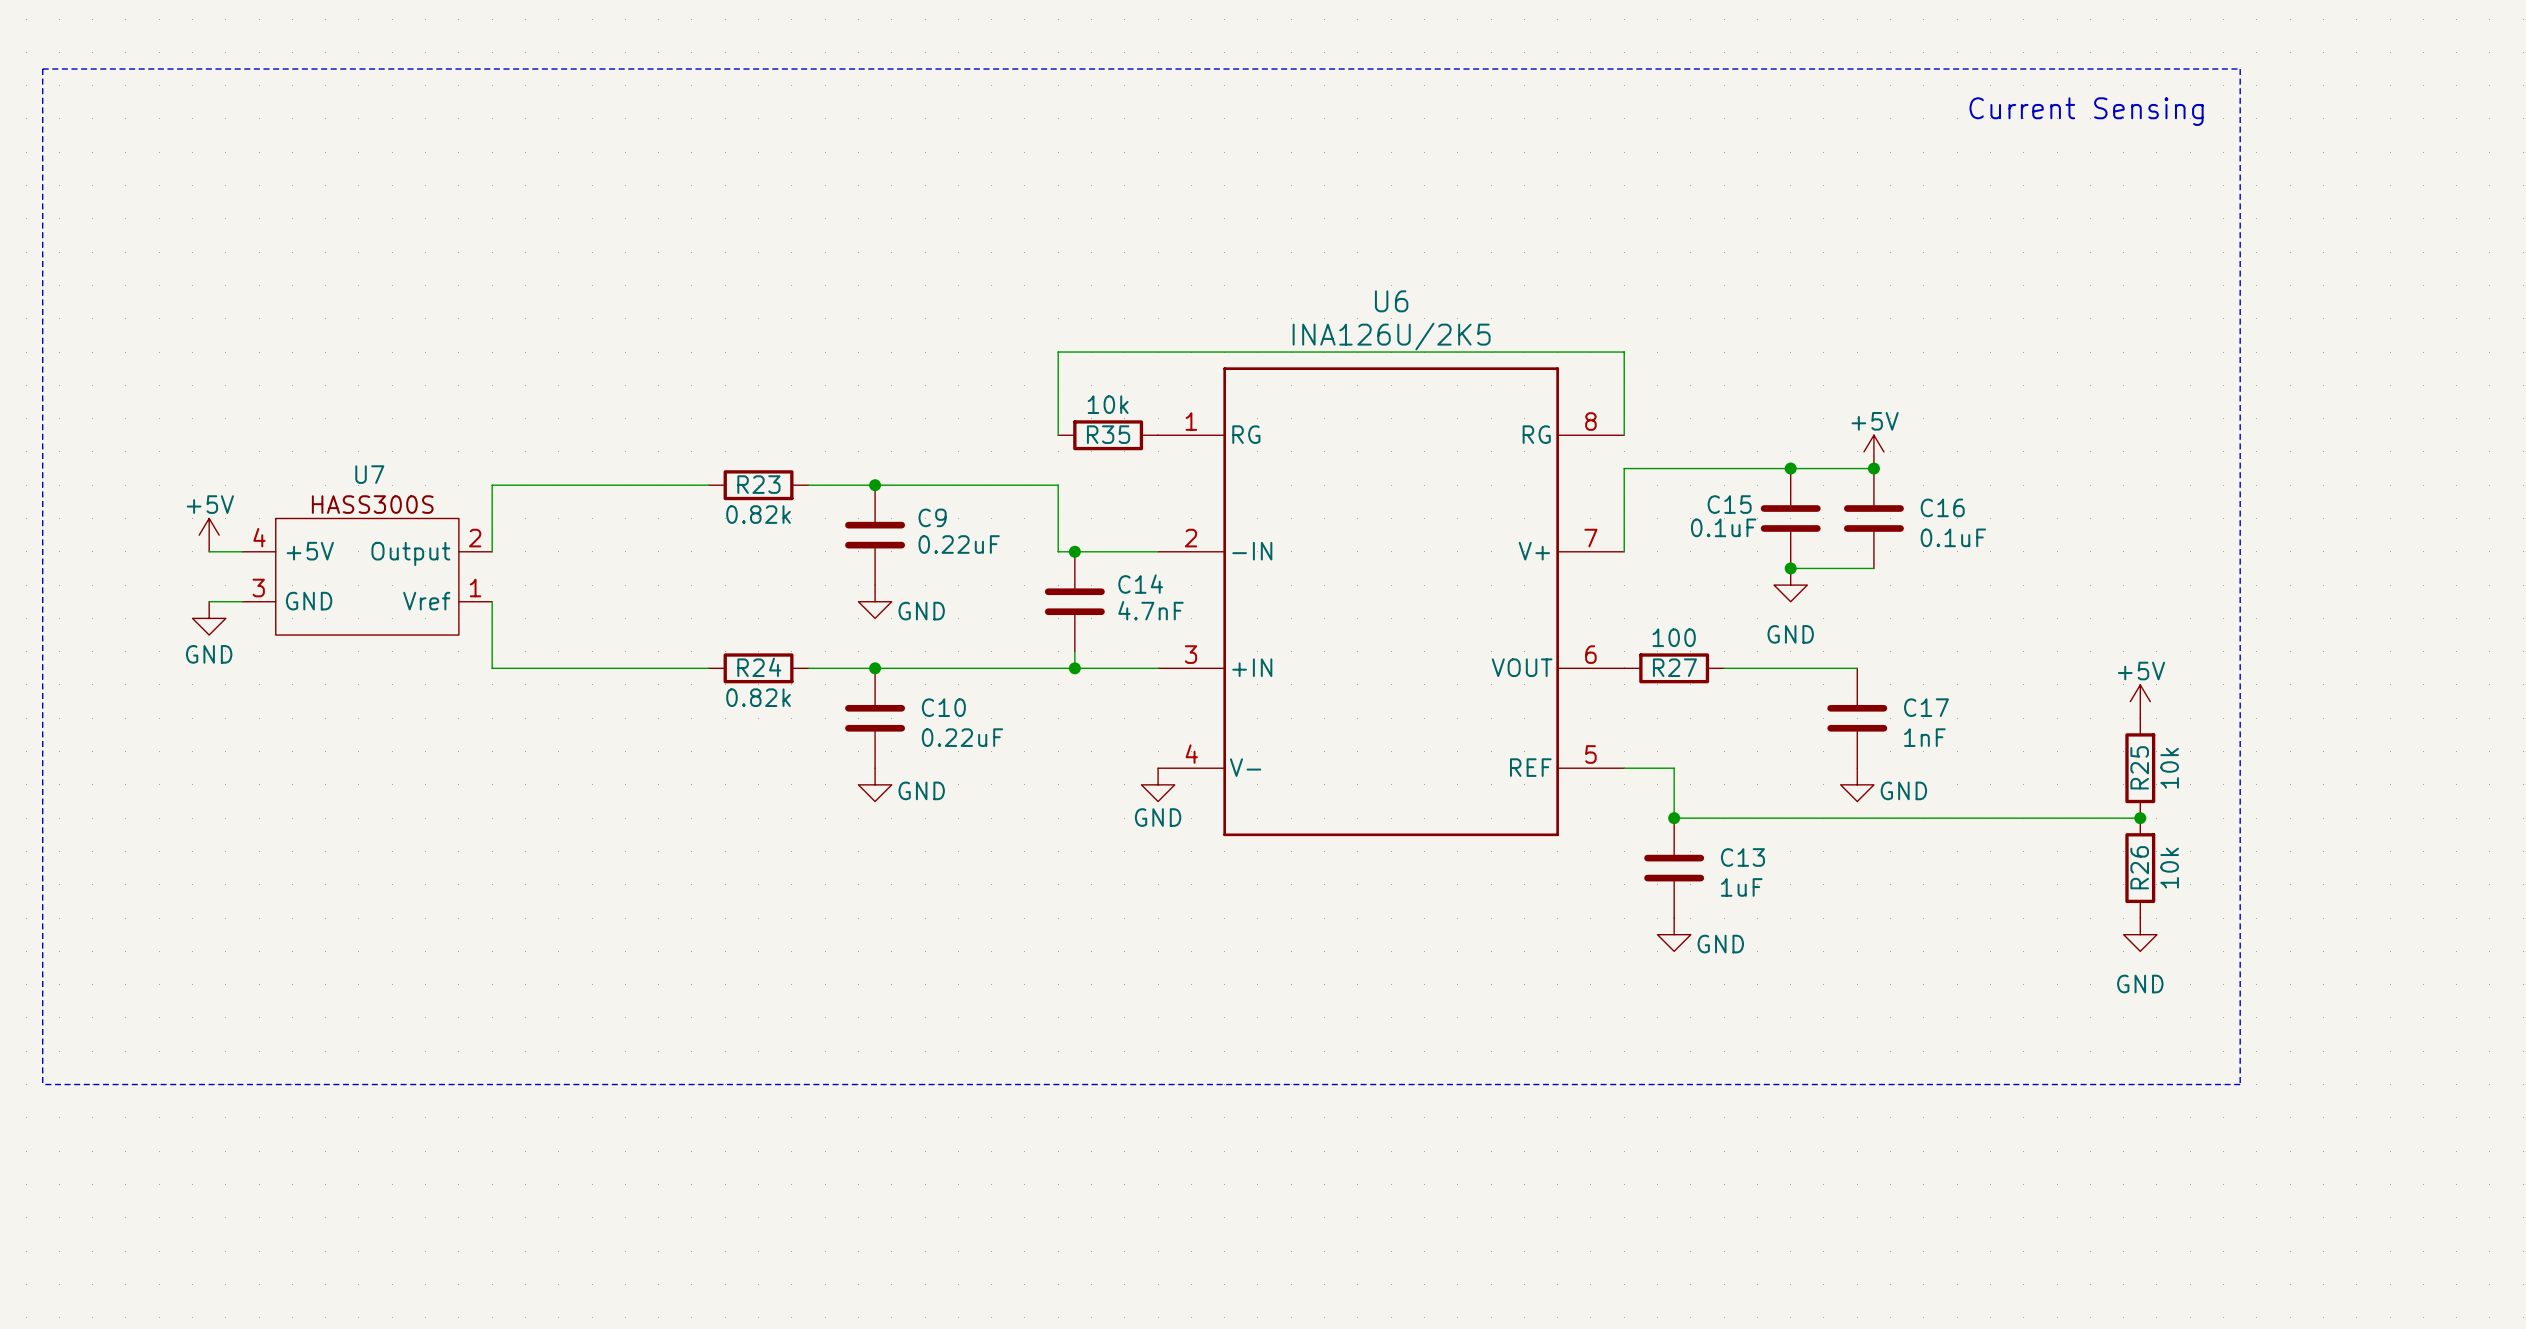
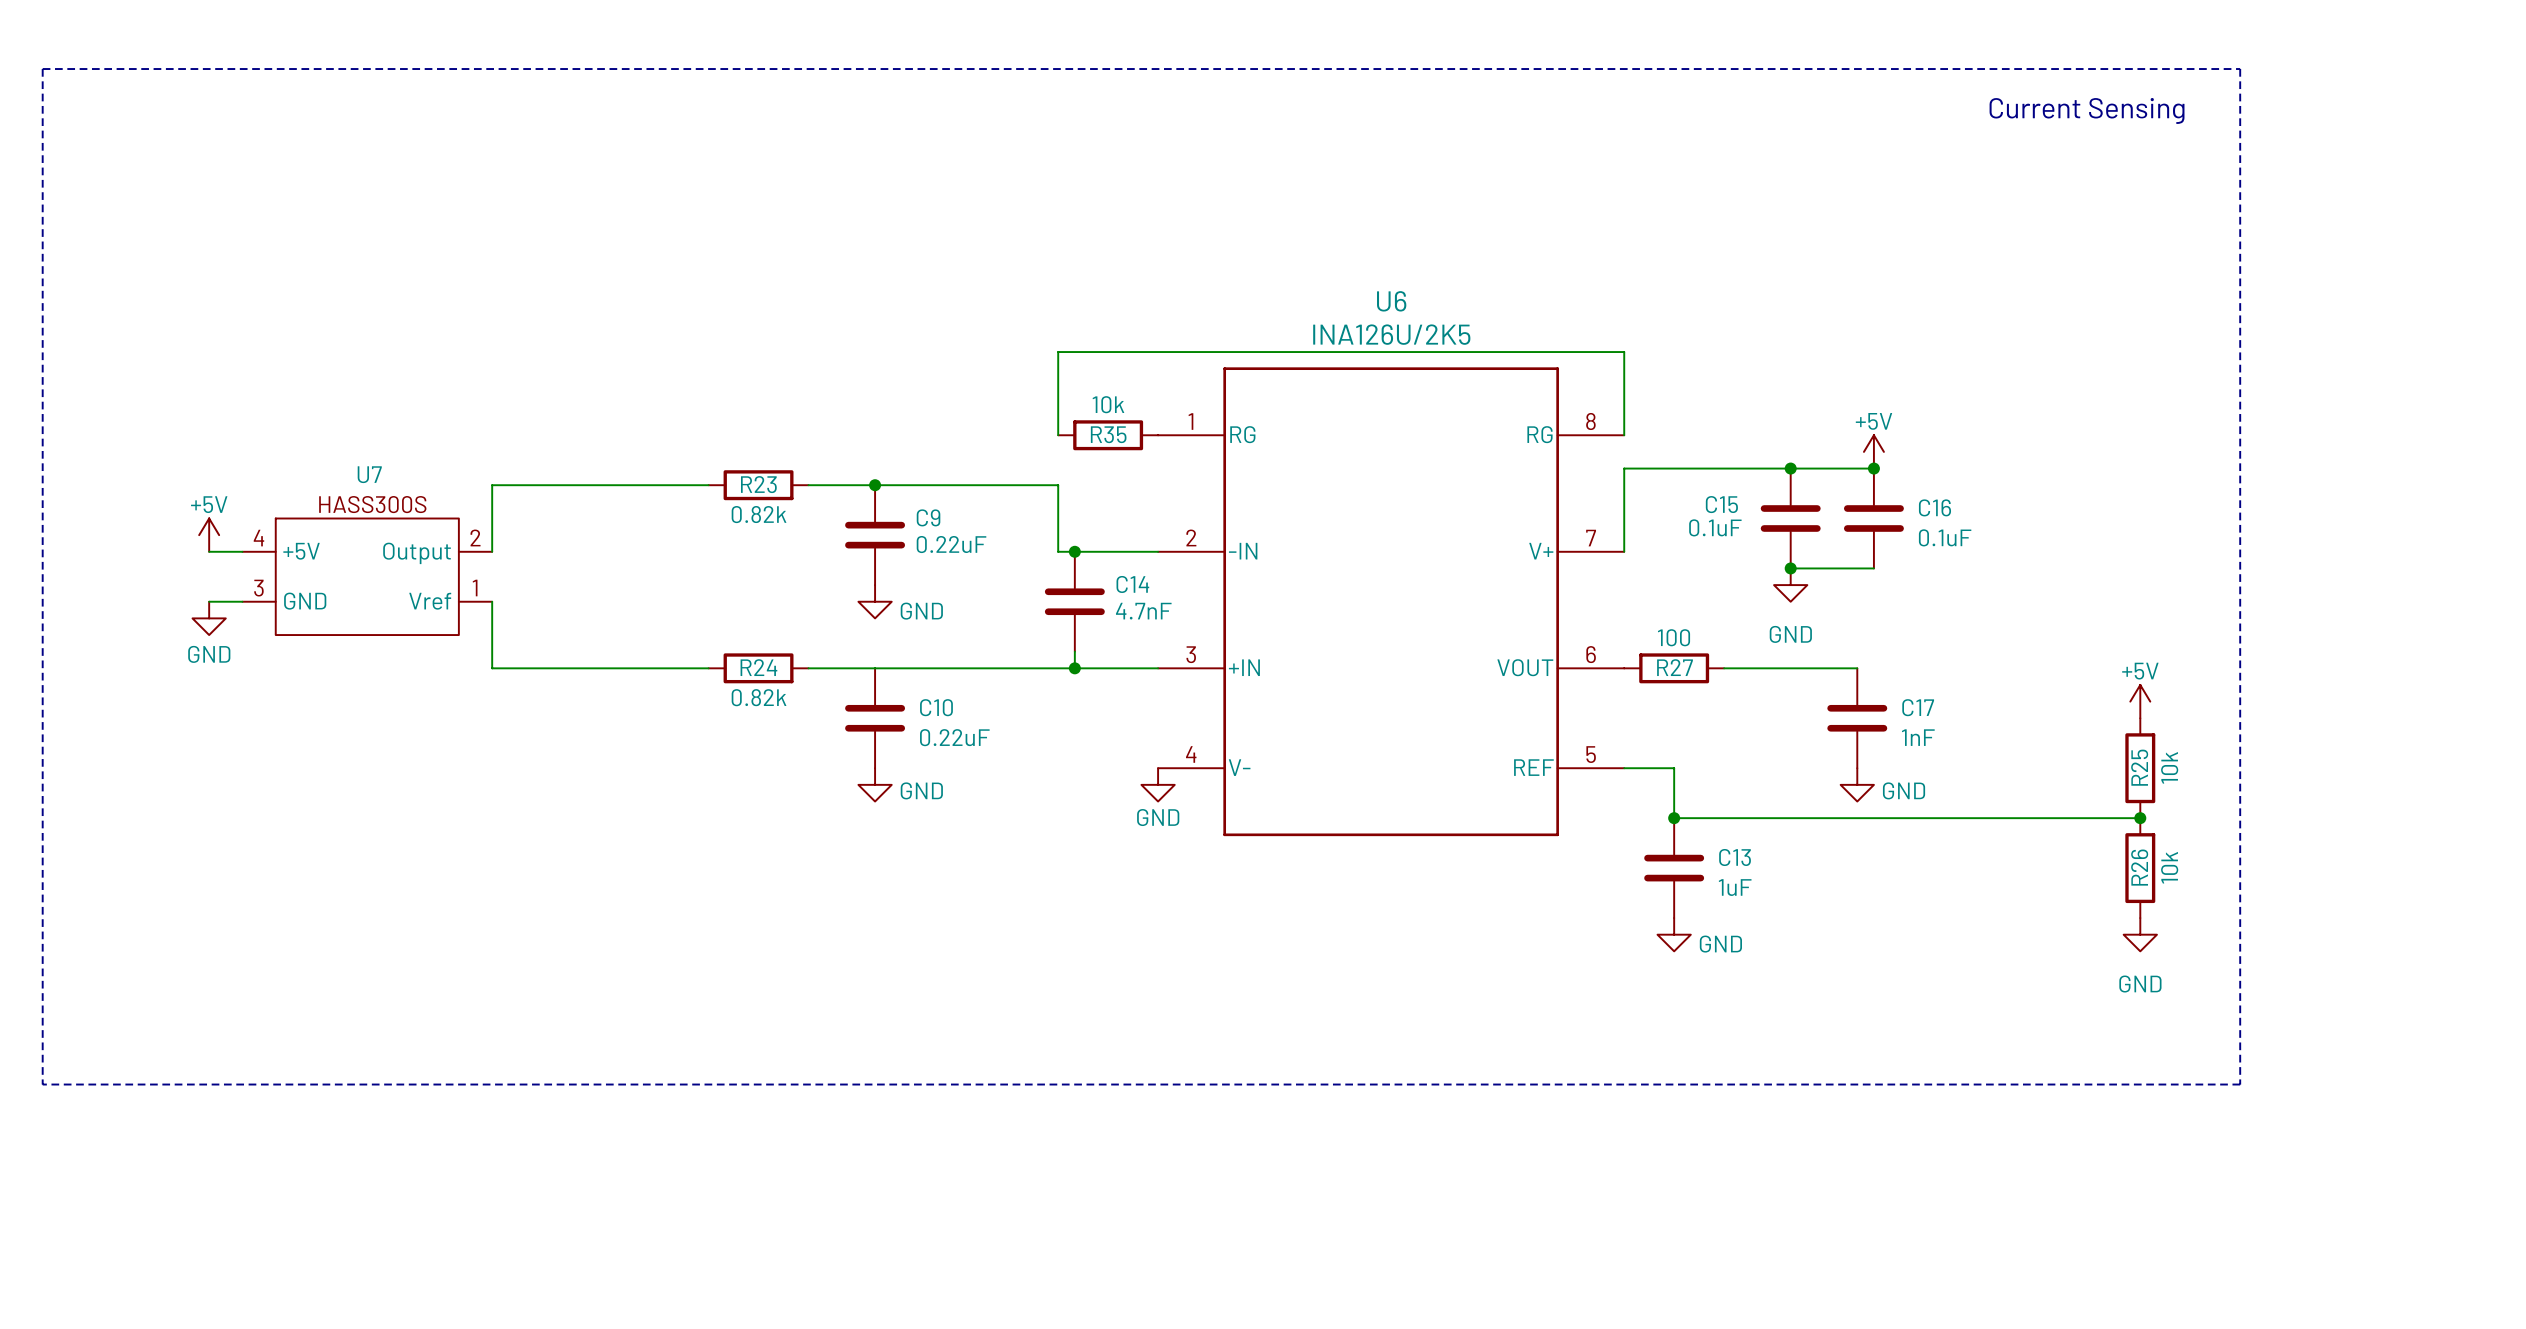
junction: (875, 668) -> none

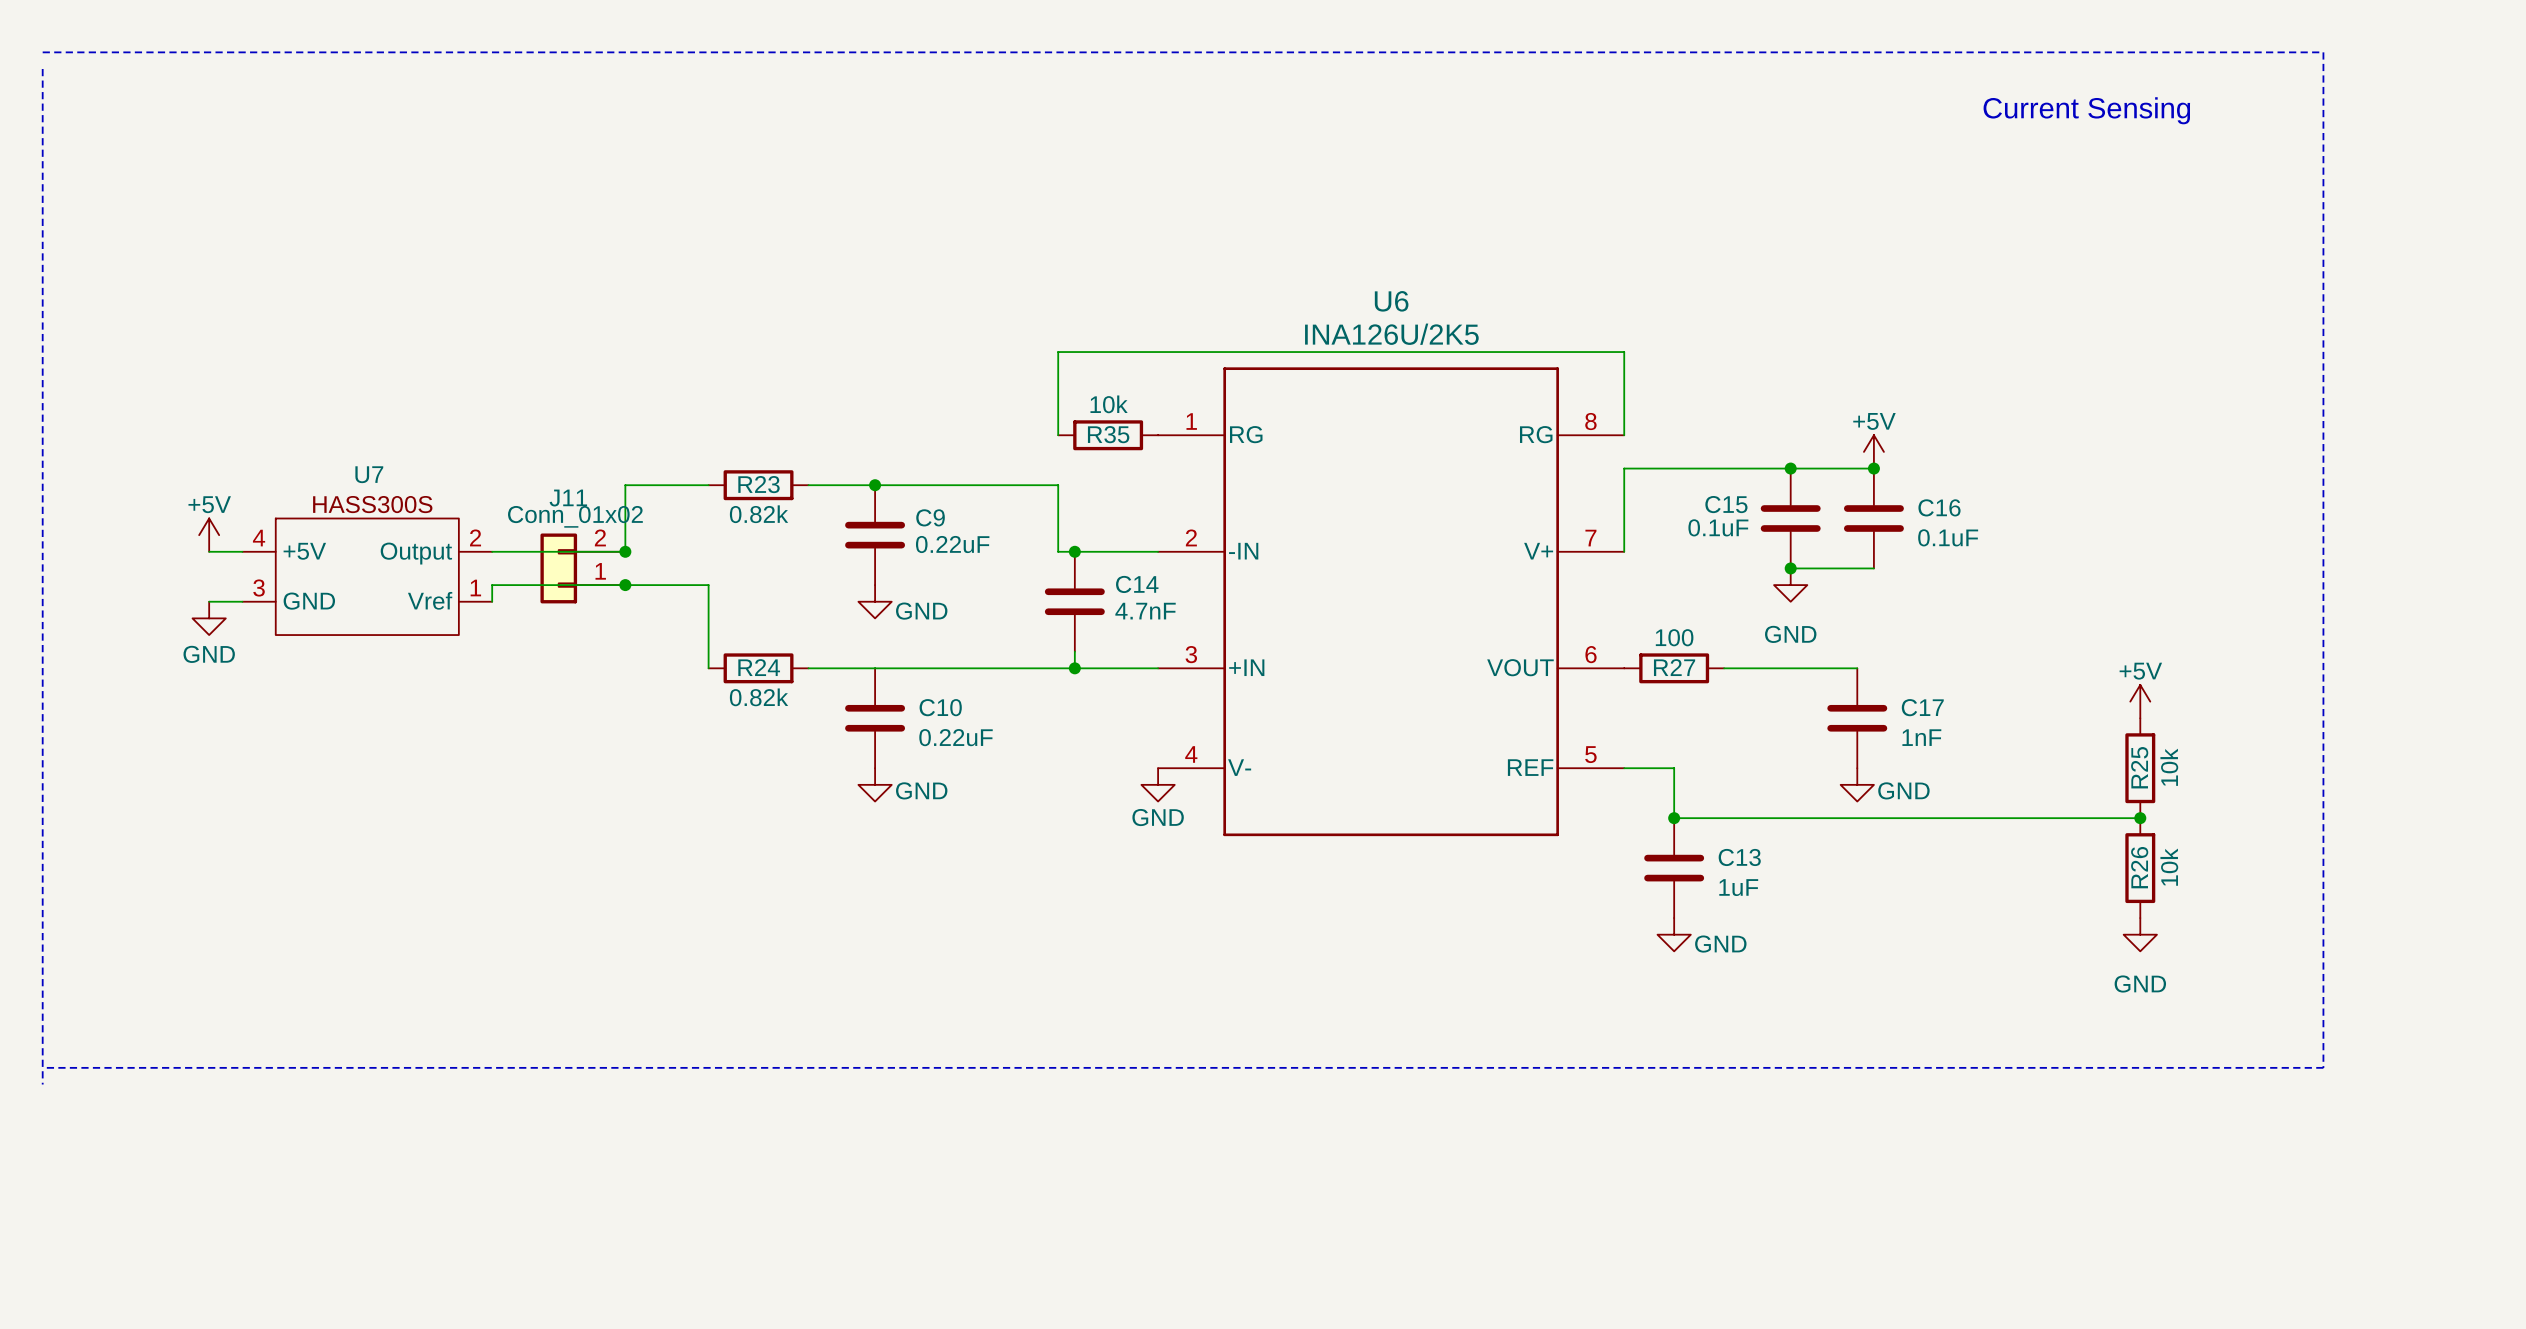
line: none -> (42, 52) (2323, 52) (2323, 1067) (42, 1067)
line: (42, 69) (2240, 69) (2240, 1084) (42, 1084) -> none
wire: (625, 485) (492, 485) (492, 551) -> (625, 485) (625, 551) (492, 551)
junction: none -> (625, 551)
J11: none -> Conn_01x02 (582, 568)
junction: none -> (625, 585)
wire: (492, 601) (492, 668) (708, 668) -> (492, 601) (492, 585) (708, 585) (708, 668)

